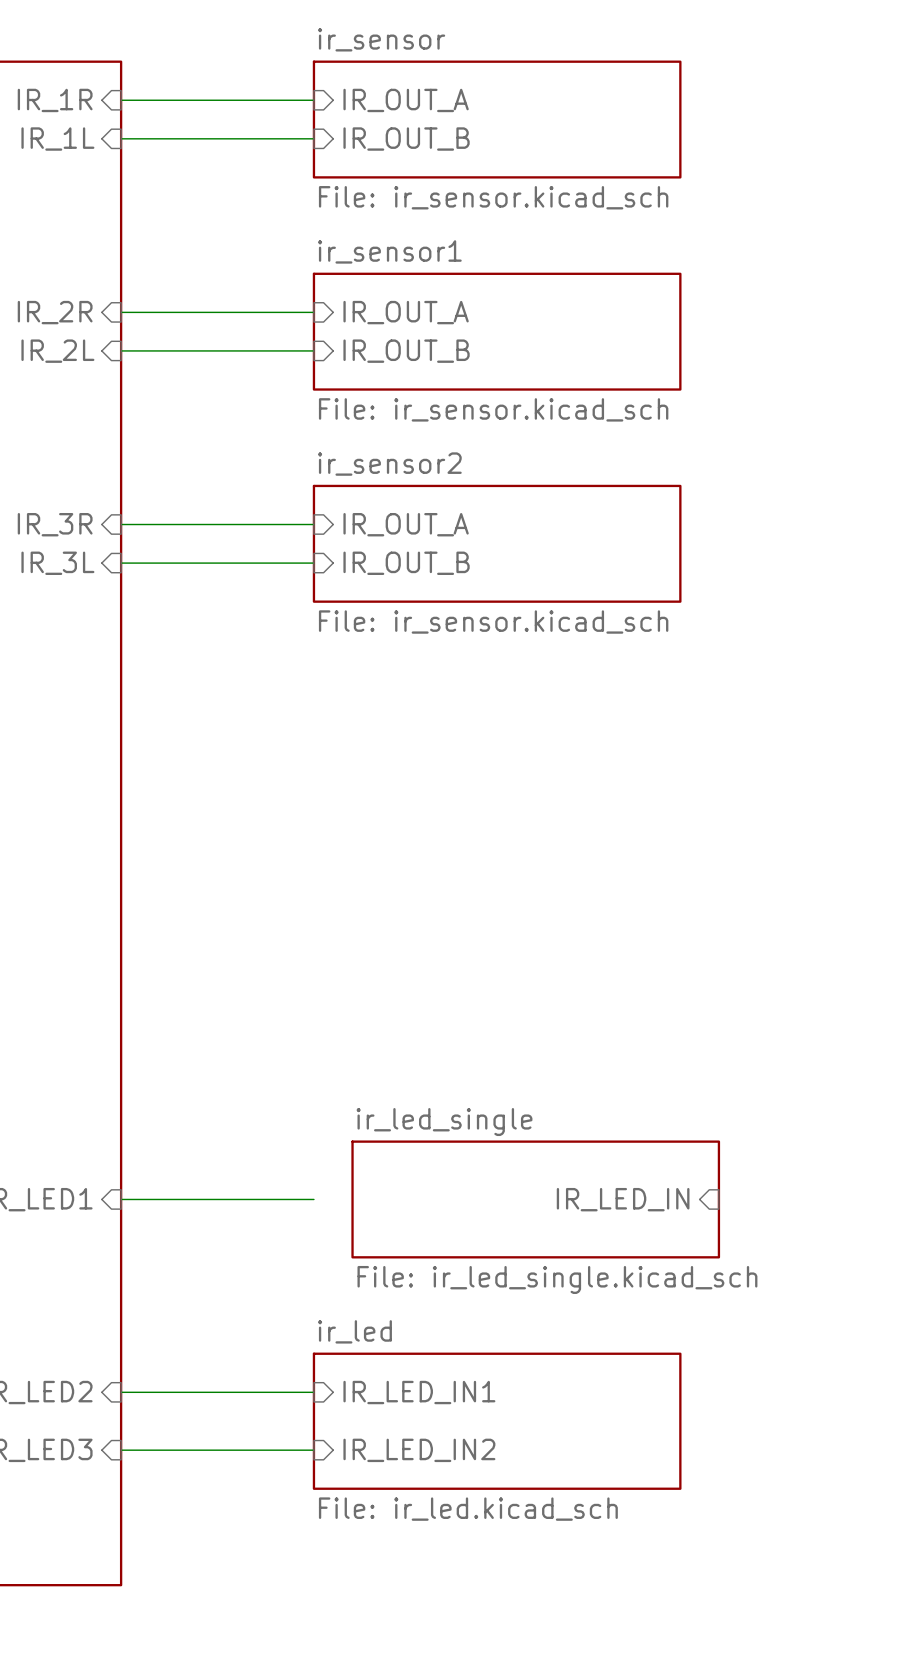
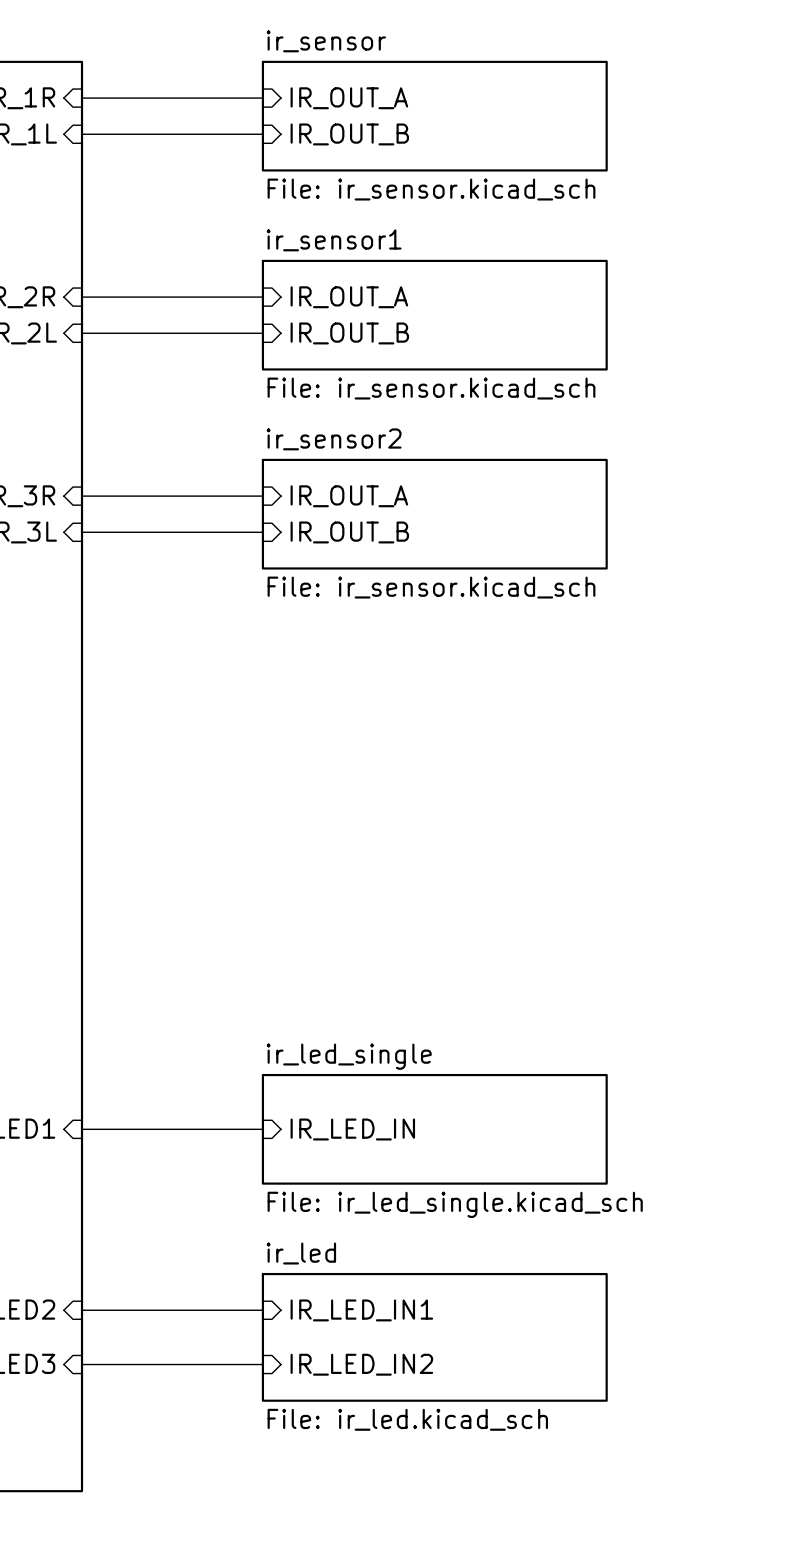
sheet ir_led_single position: (535, 1199) -> (434, 1129)
sheet pin rotation: 0° (623, 1199) -> 180° (352, 1129)
sheet pin position: IR_LED_IN (623, 1199) -> IR_LED_IN (352, 1129)

